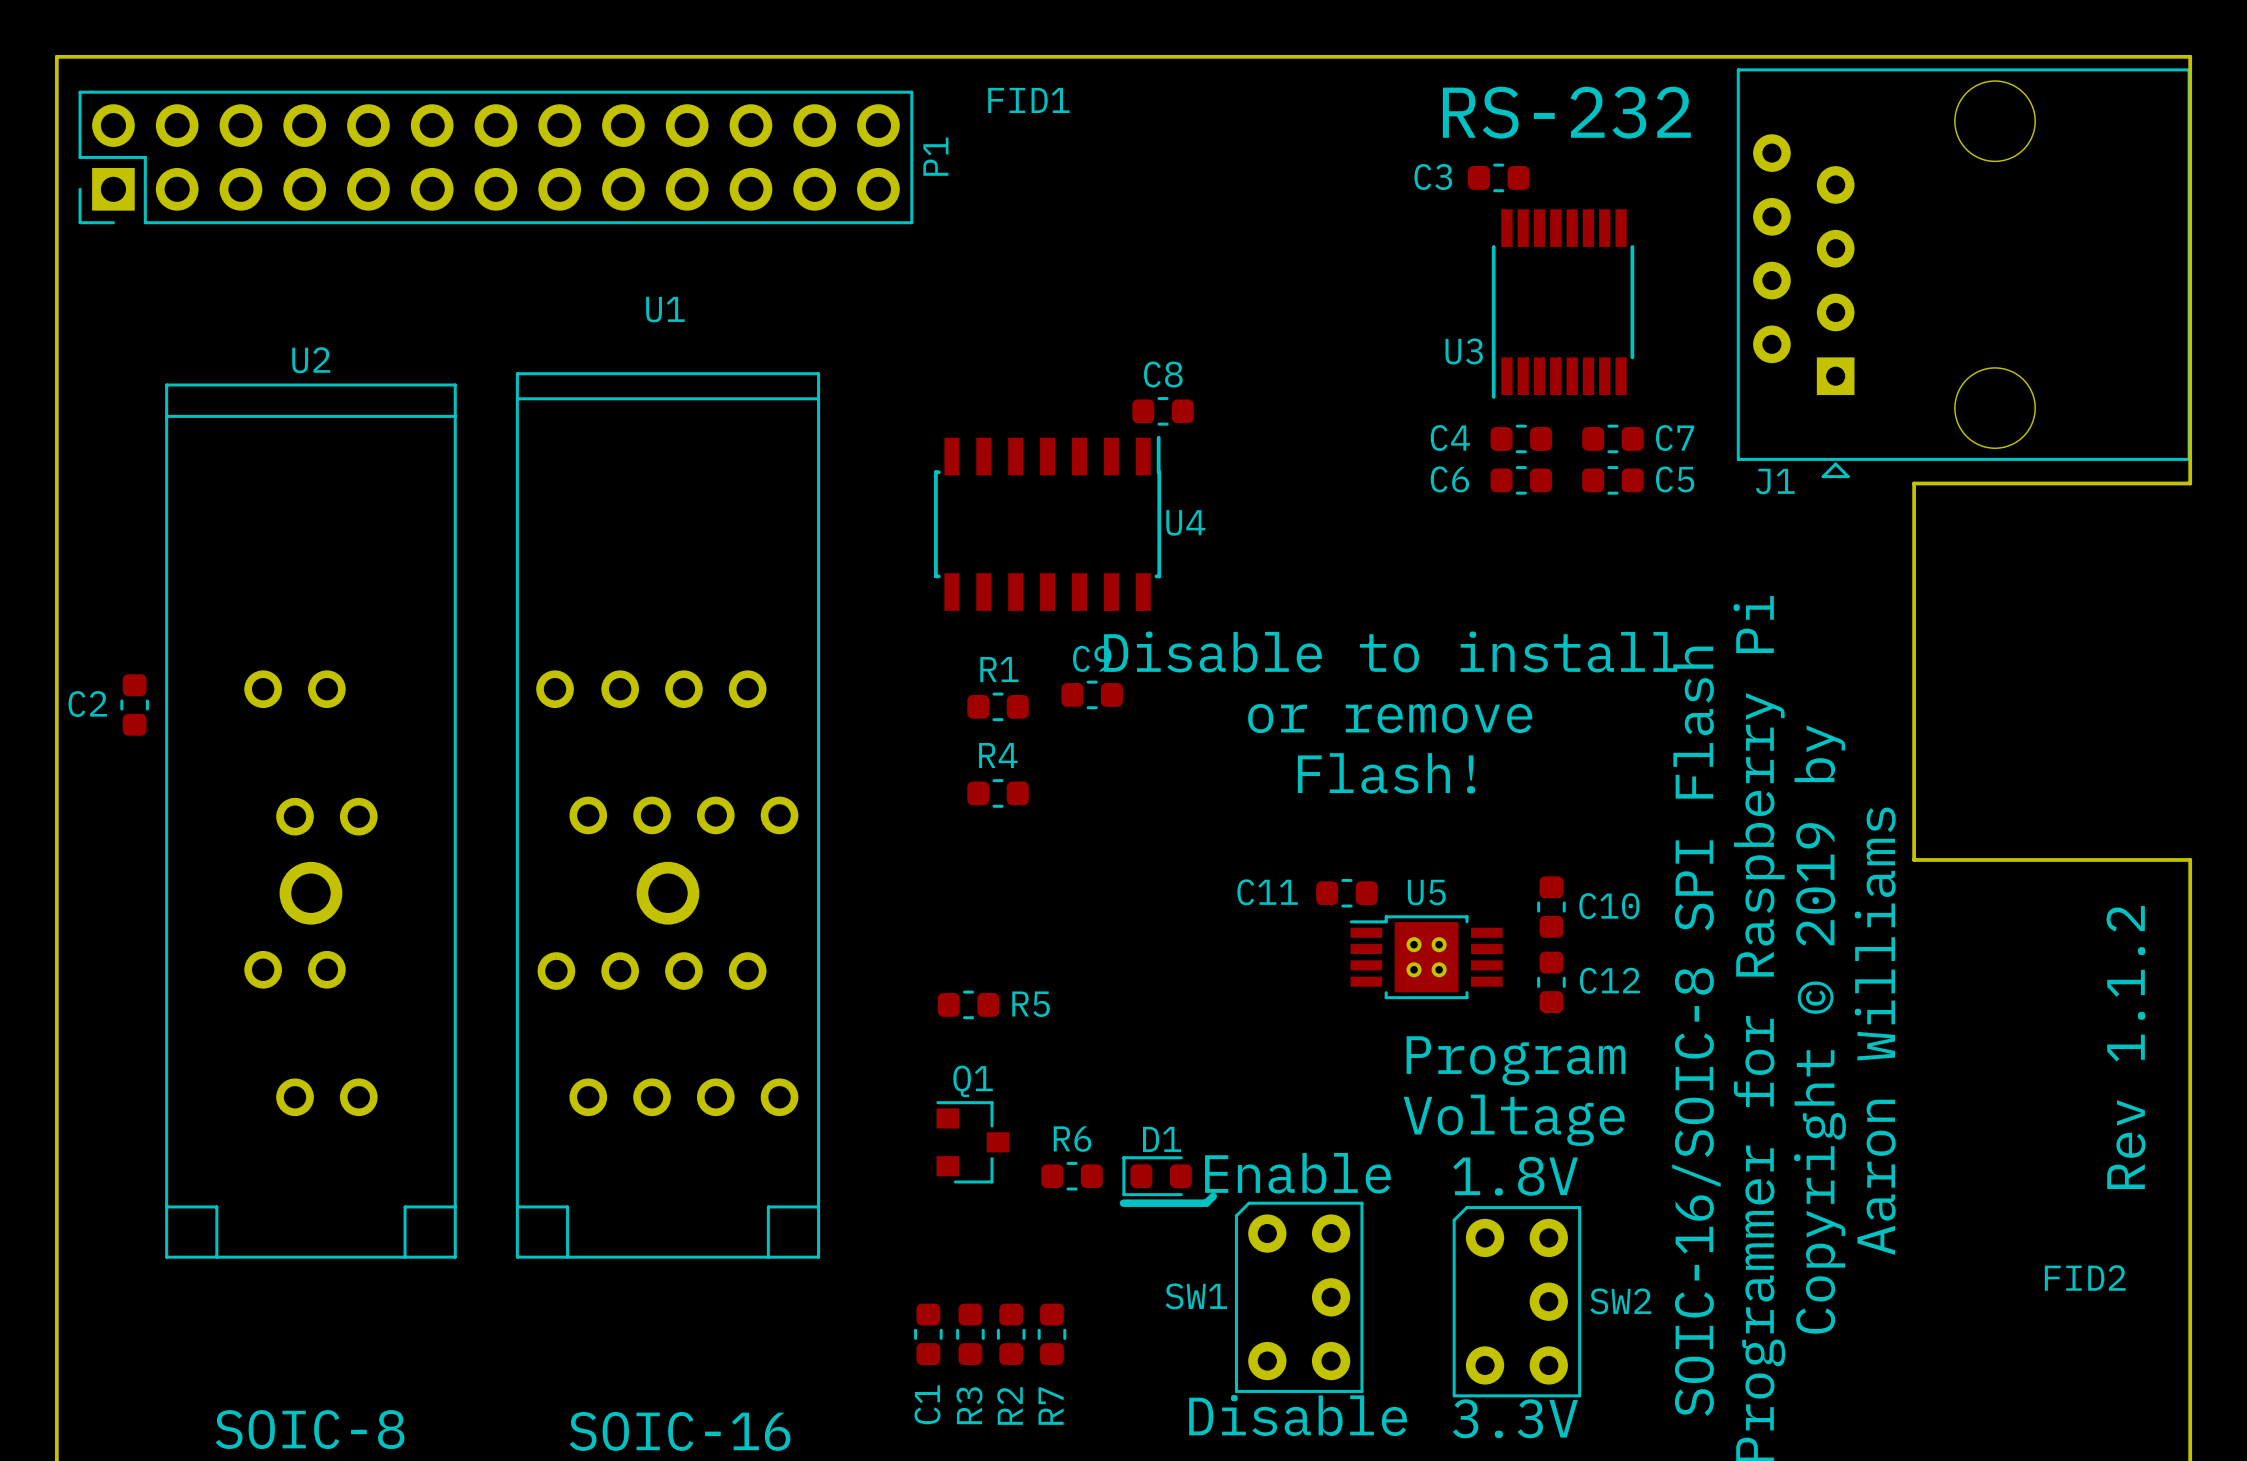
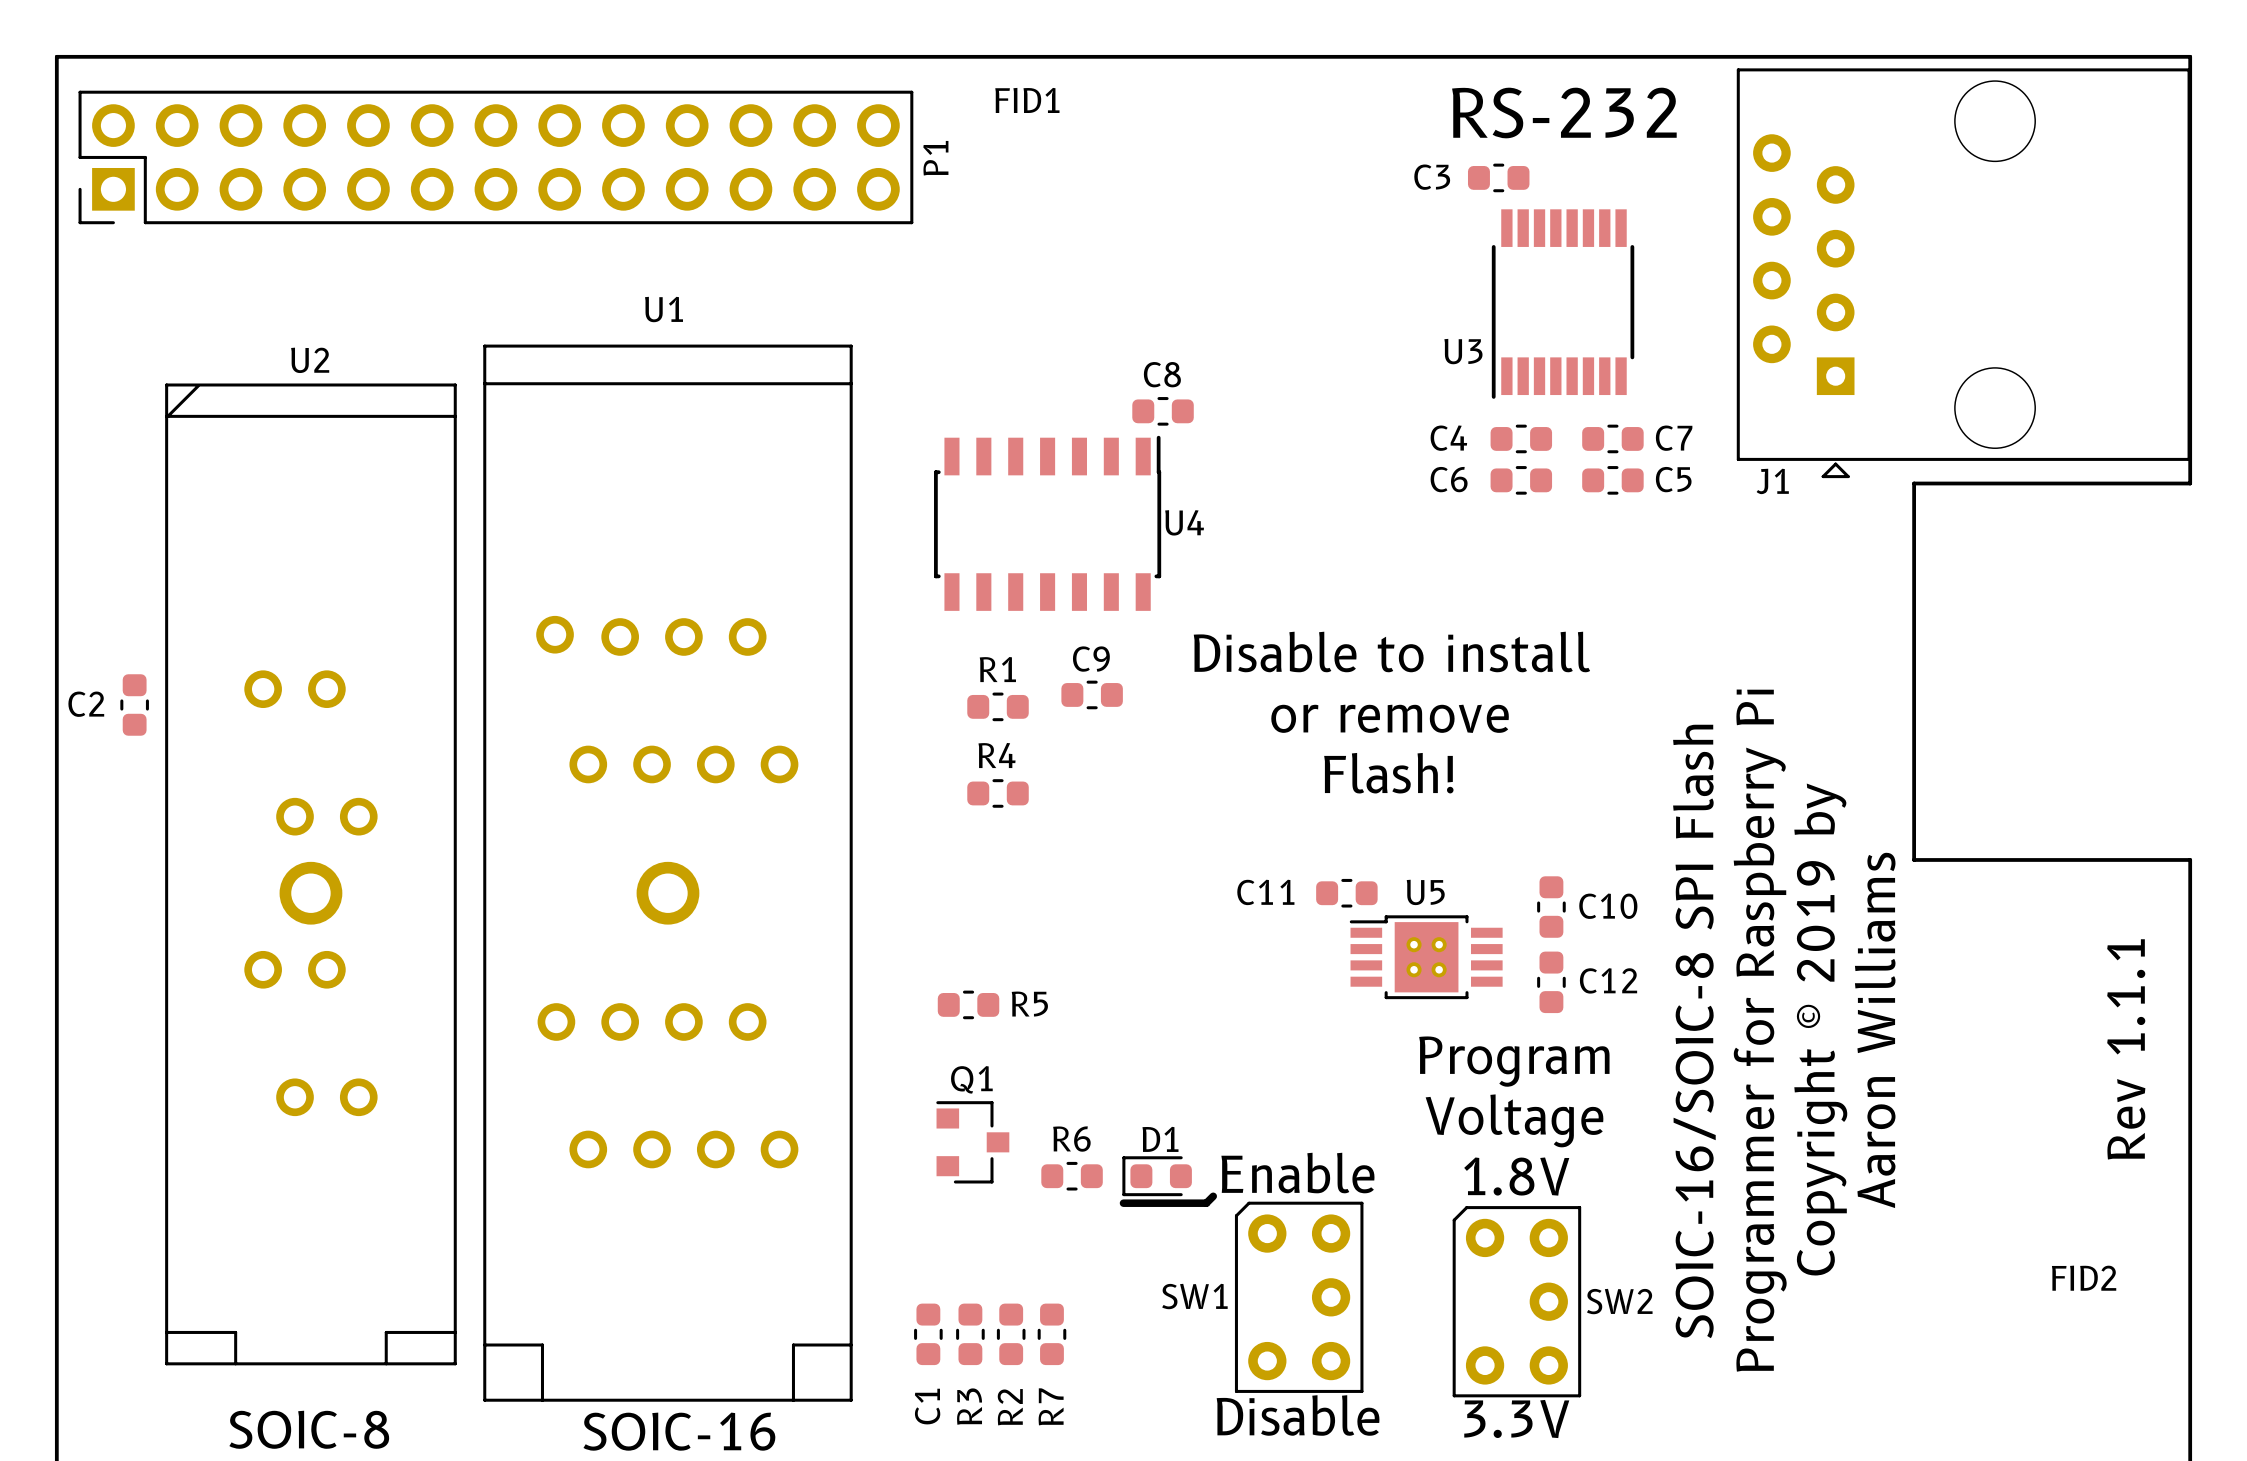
U1 footprint: [515, 372, 821, 1259] -> [483, 344, 853, 1402]
U2 footprint: [165, 383, 457, 1259] -> [165, 383, 457, 1366]
text: Rev 1.1.2 (2126, 1047) -> Rev 1.1.1 (2126, 1049)

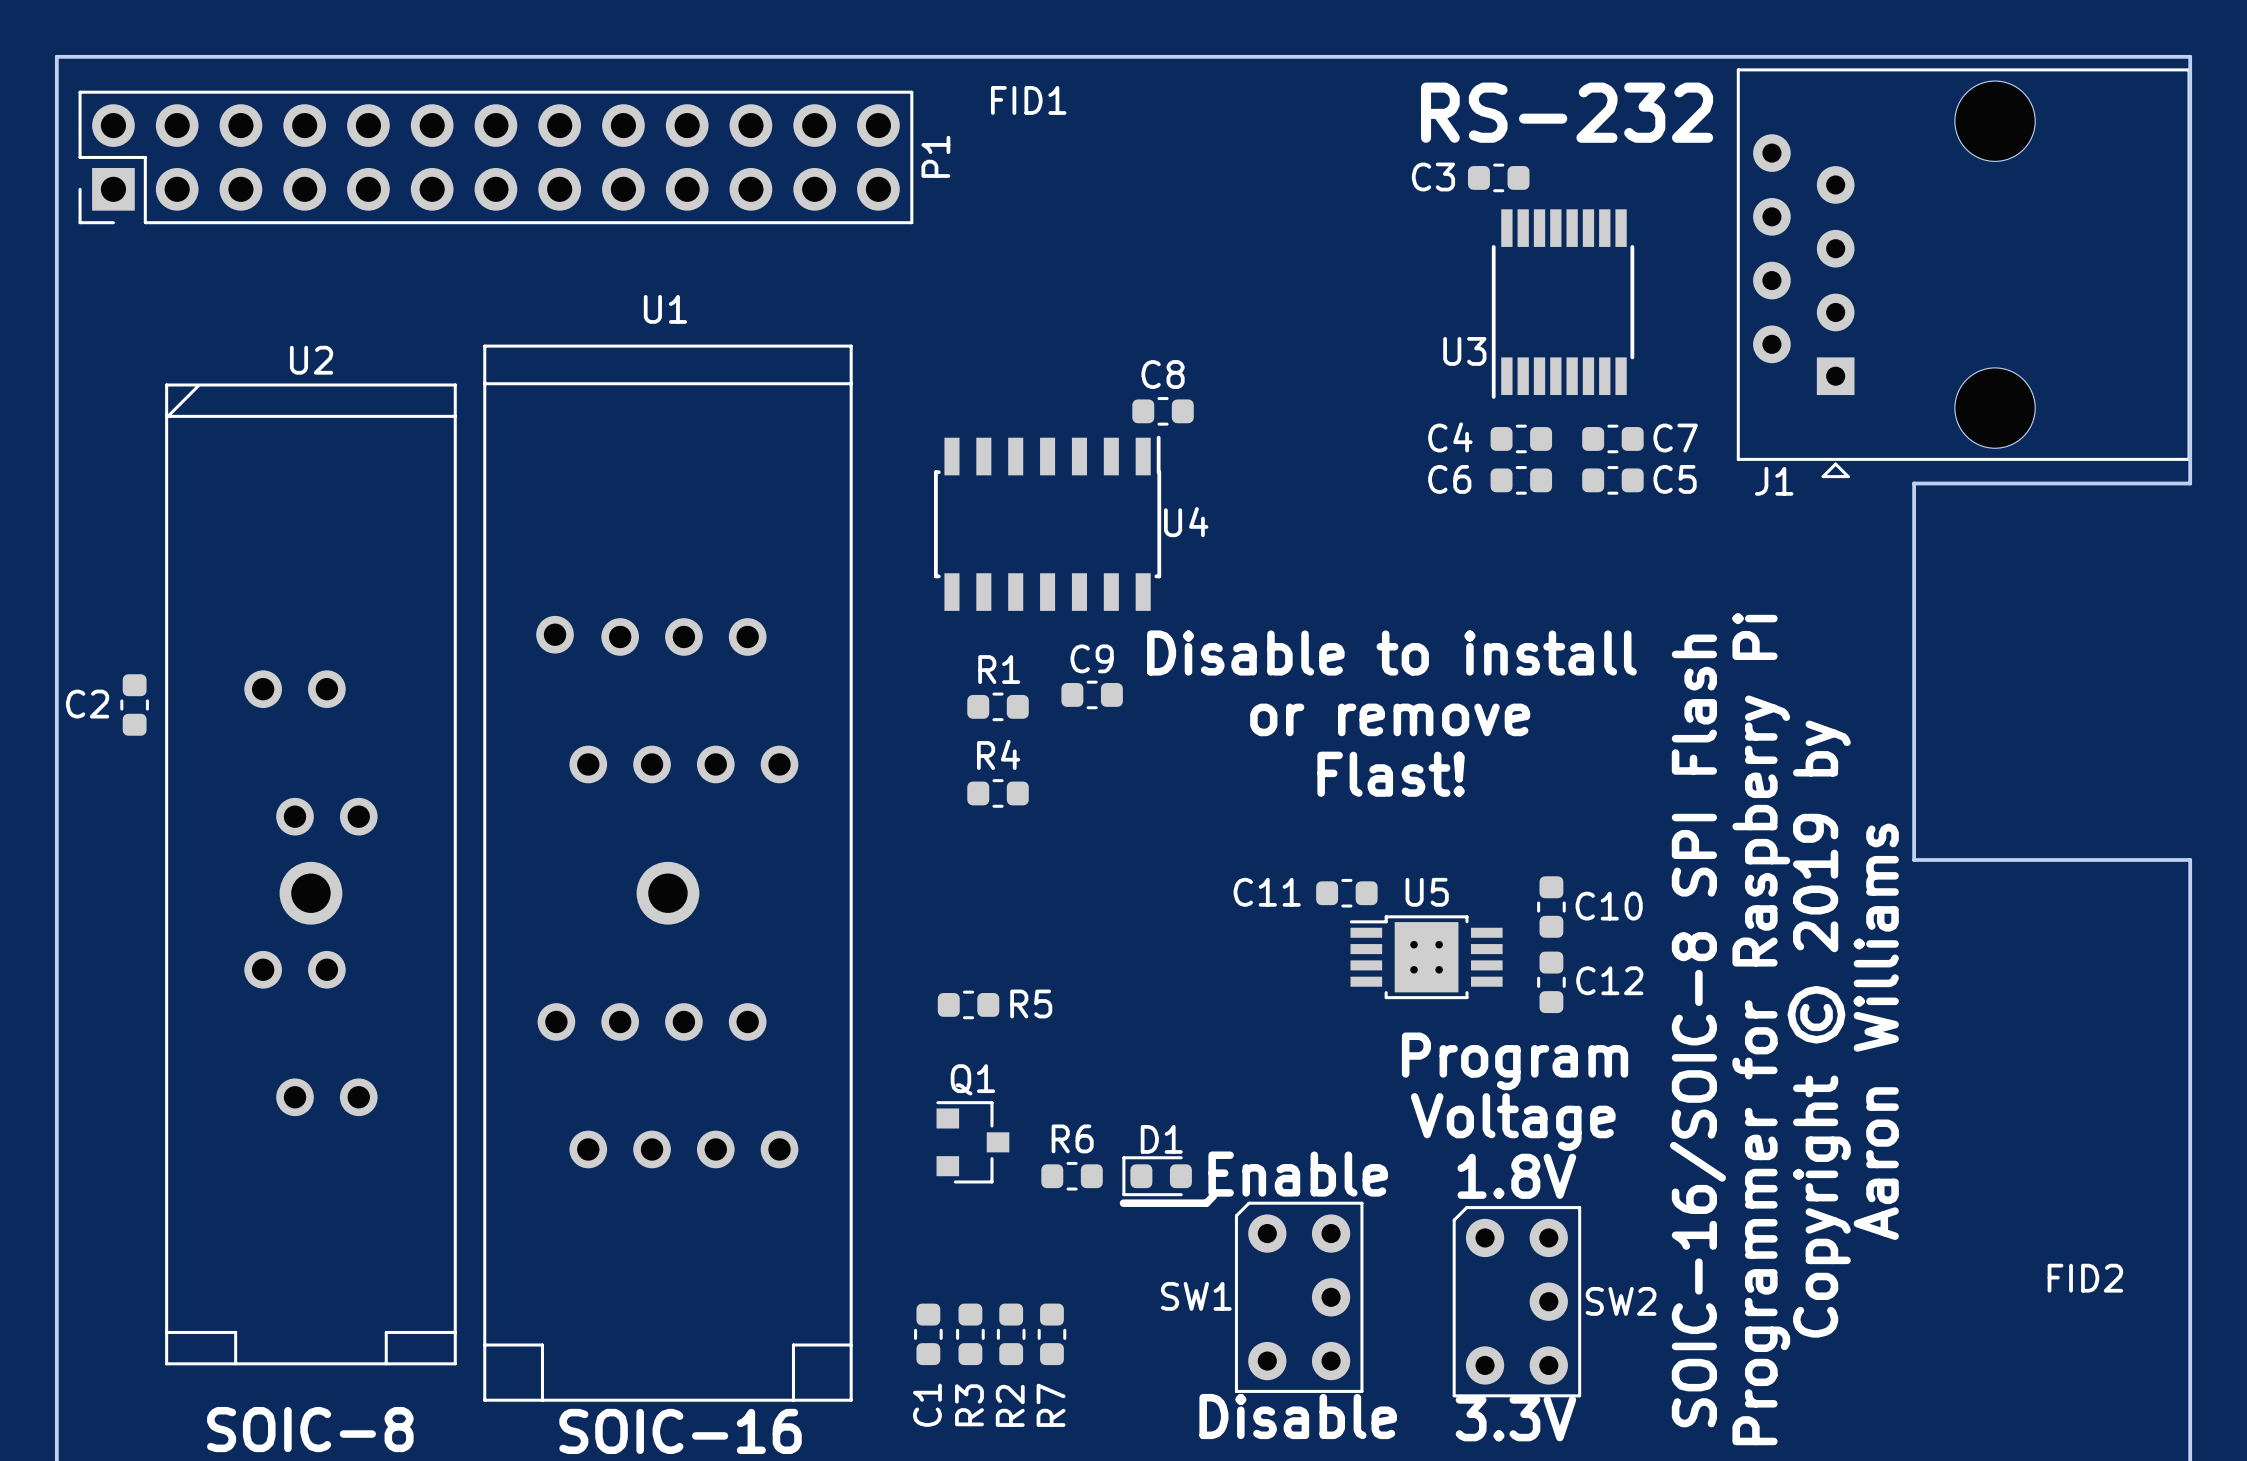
text: Flash! (1388, 773) -> Flast! (1391, 774)
text: Rev 1.1.1 (2126, 1049) -> none

